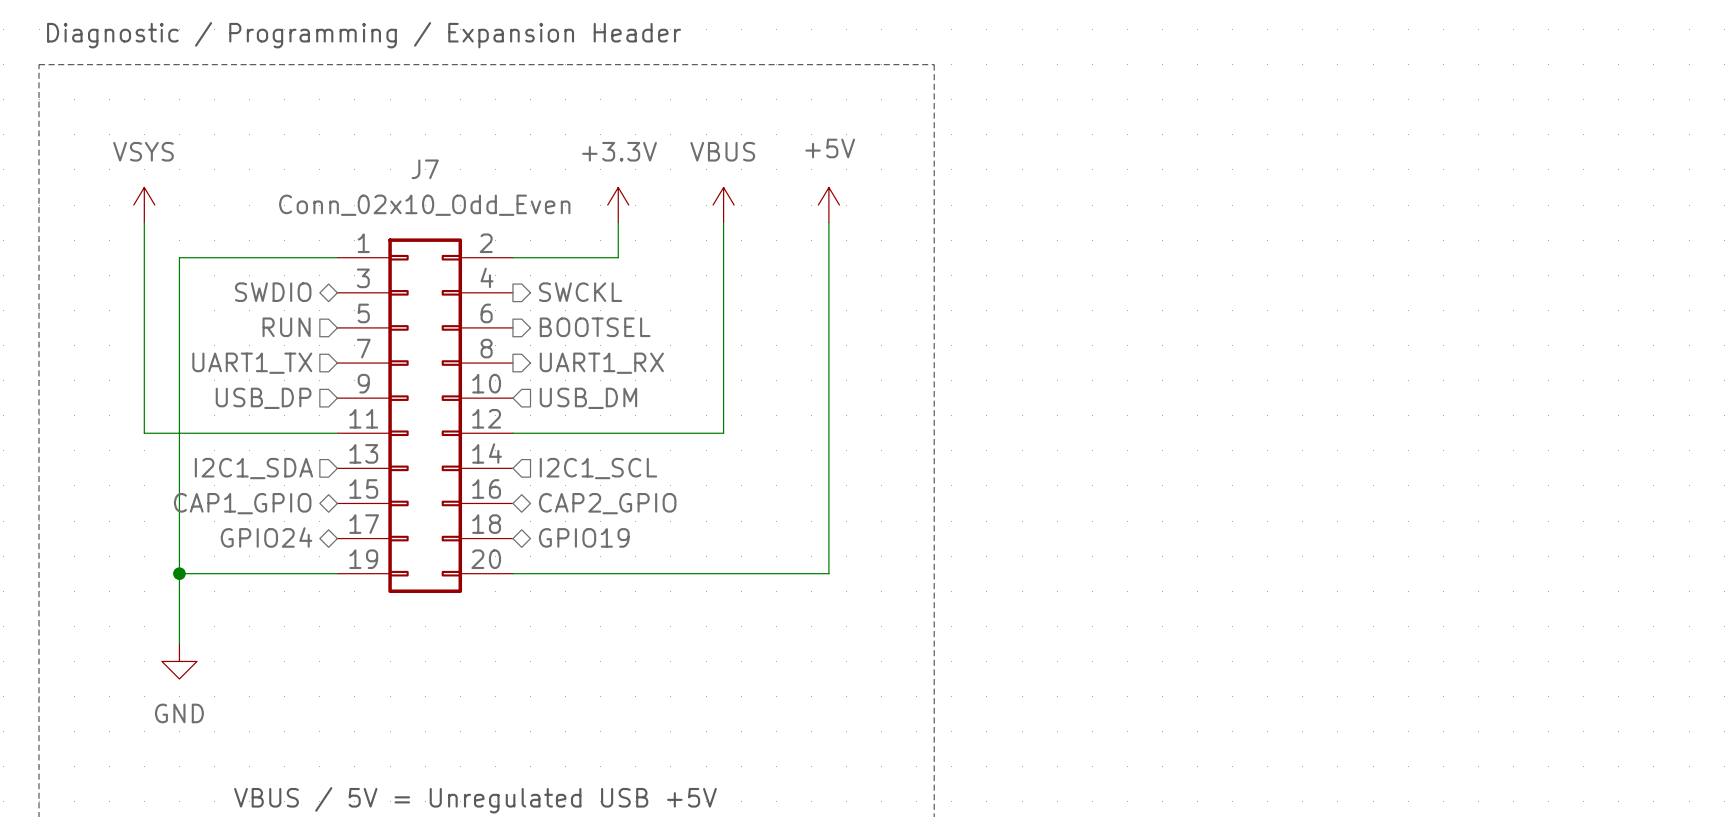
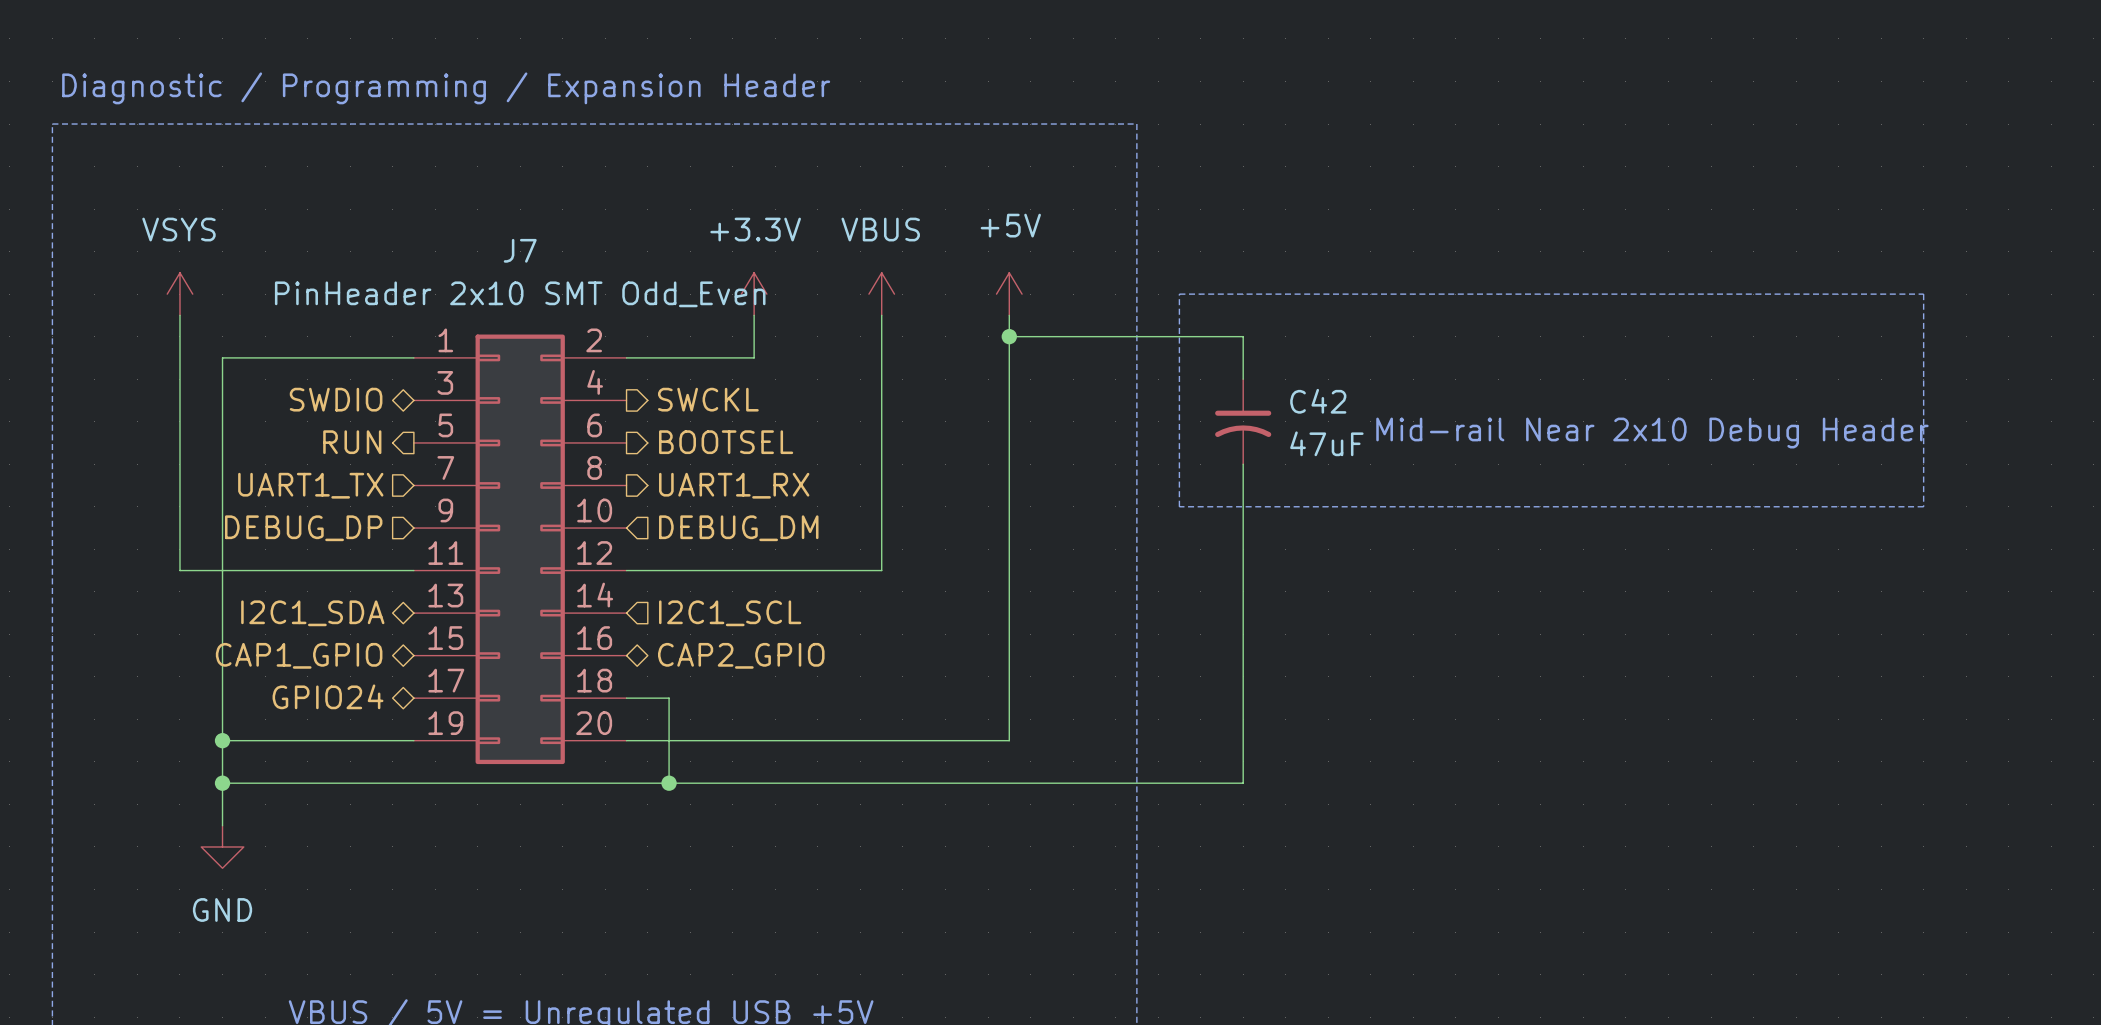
J7 value: Conn_02x10_Odd_Even (424, 205) -> PinHeader 2x10 SMT Odd_Even (520, 294)
line: none -> (1179, 294) (1923, 294) (1923, 506) (1179, 506) (1179, 294)
wire: none -> (1009, 336) (1243, 336) (1243, 379)
junction: none -> (1009, 336)
C42: none -> 47uF (1243, 421)
text: none -> Mid-rail Near 2x10 Debug Header (1652, 433)
hierarchical label shape: input (286, 327) -> output (352, 442)
wire: none -> (1243, 464) (1243, 783) (222, 783)
hierarchical label: USB_DP (263, 398) -> DEBUG_DP (303, 528)
hierarchical label: USB_DM (588, 398) -> DEBUG_DM (738, 528)
hierarchical label shape: input (253, 468) -> bidirectional (312, 613)
hierarchical label: GPIO19 (584, 537) -> none
wire: none -> (626, 698) (669, 698) (669, 783)
junction: none -> (222, 783)
junction: none -> (669, 783)

